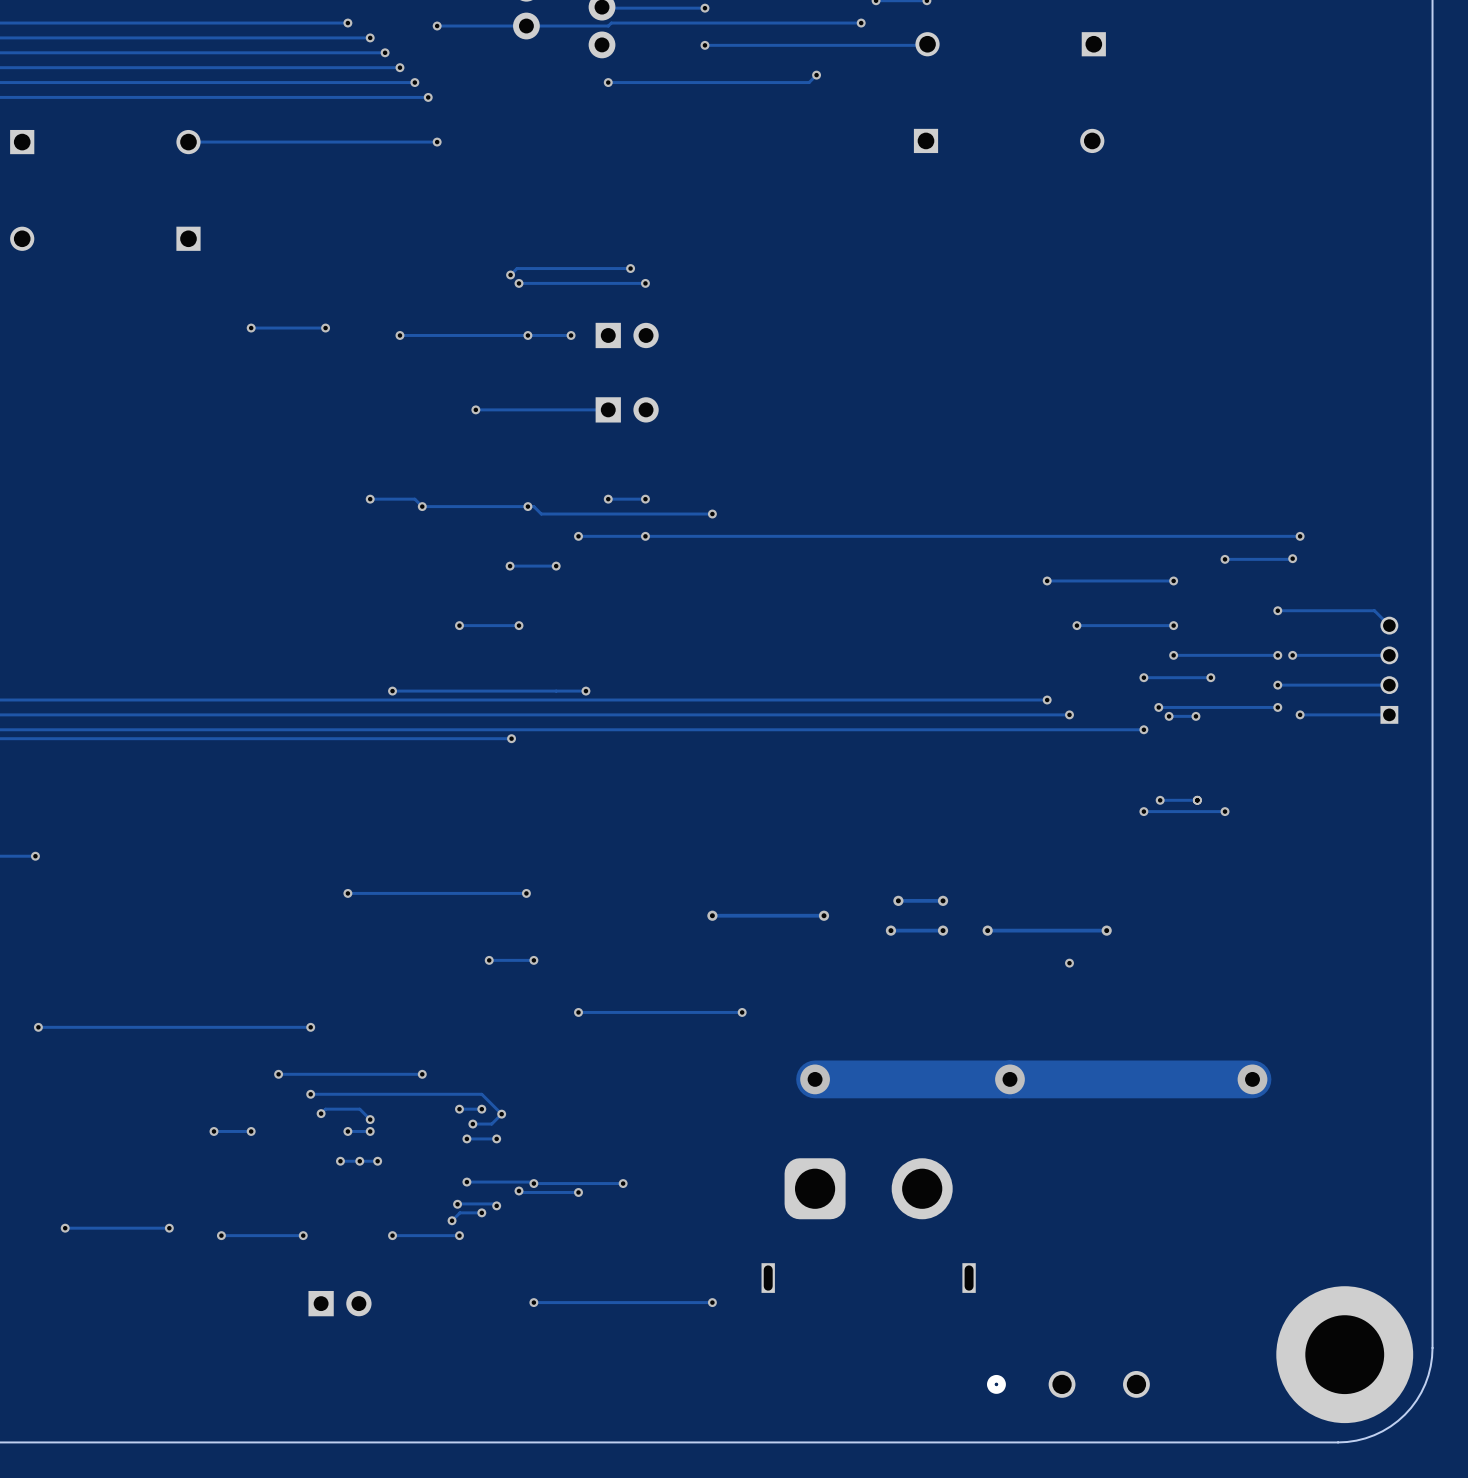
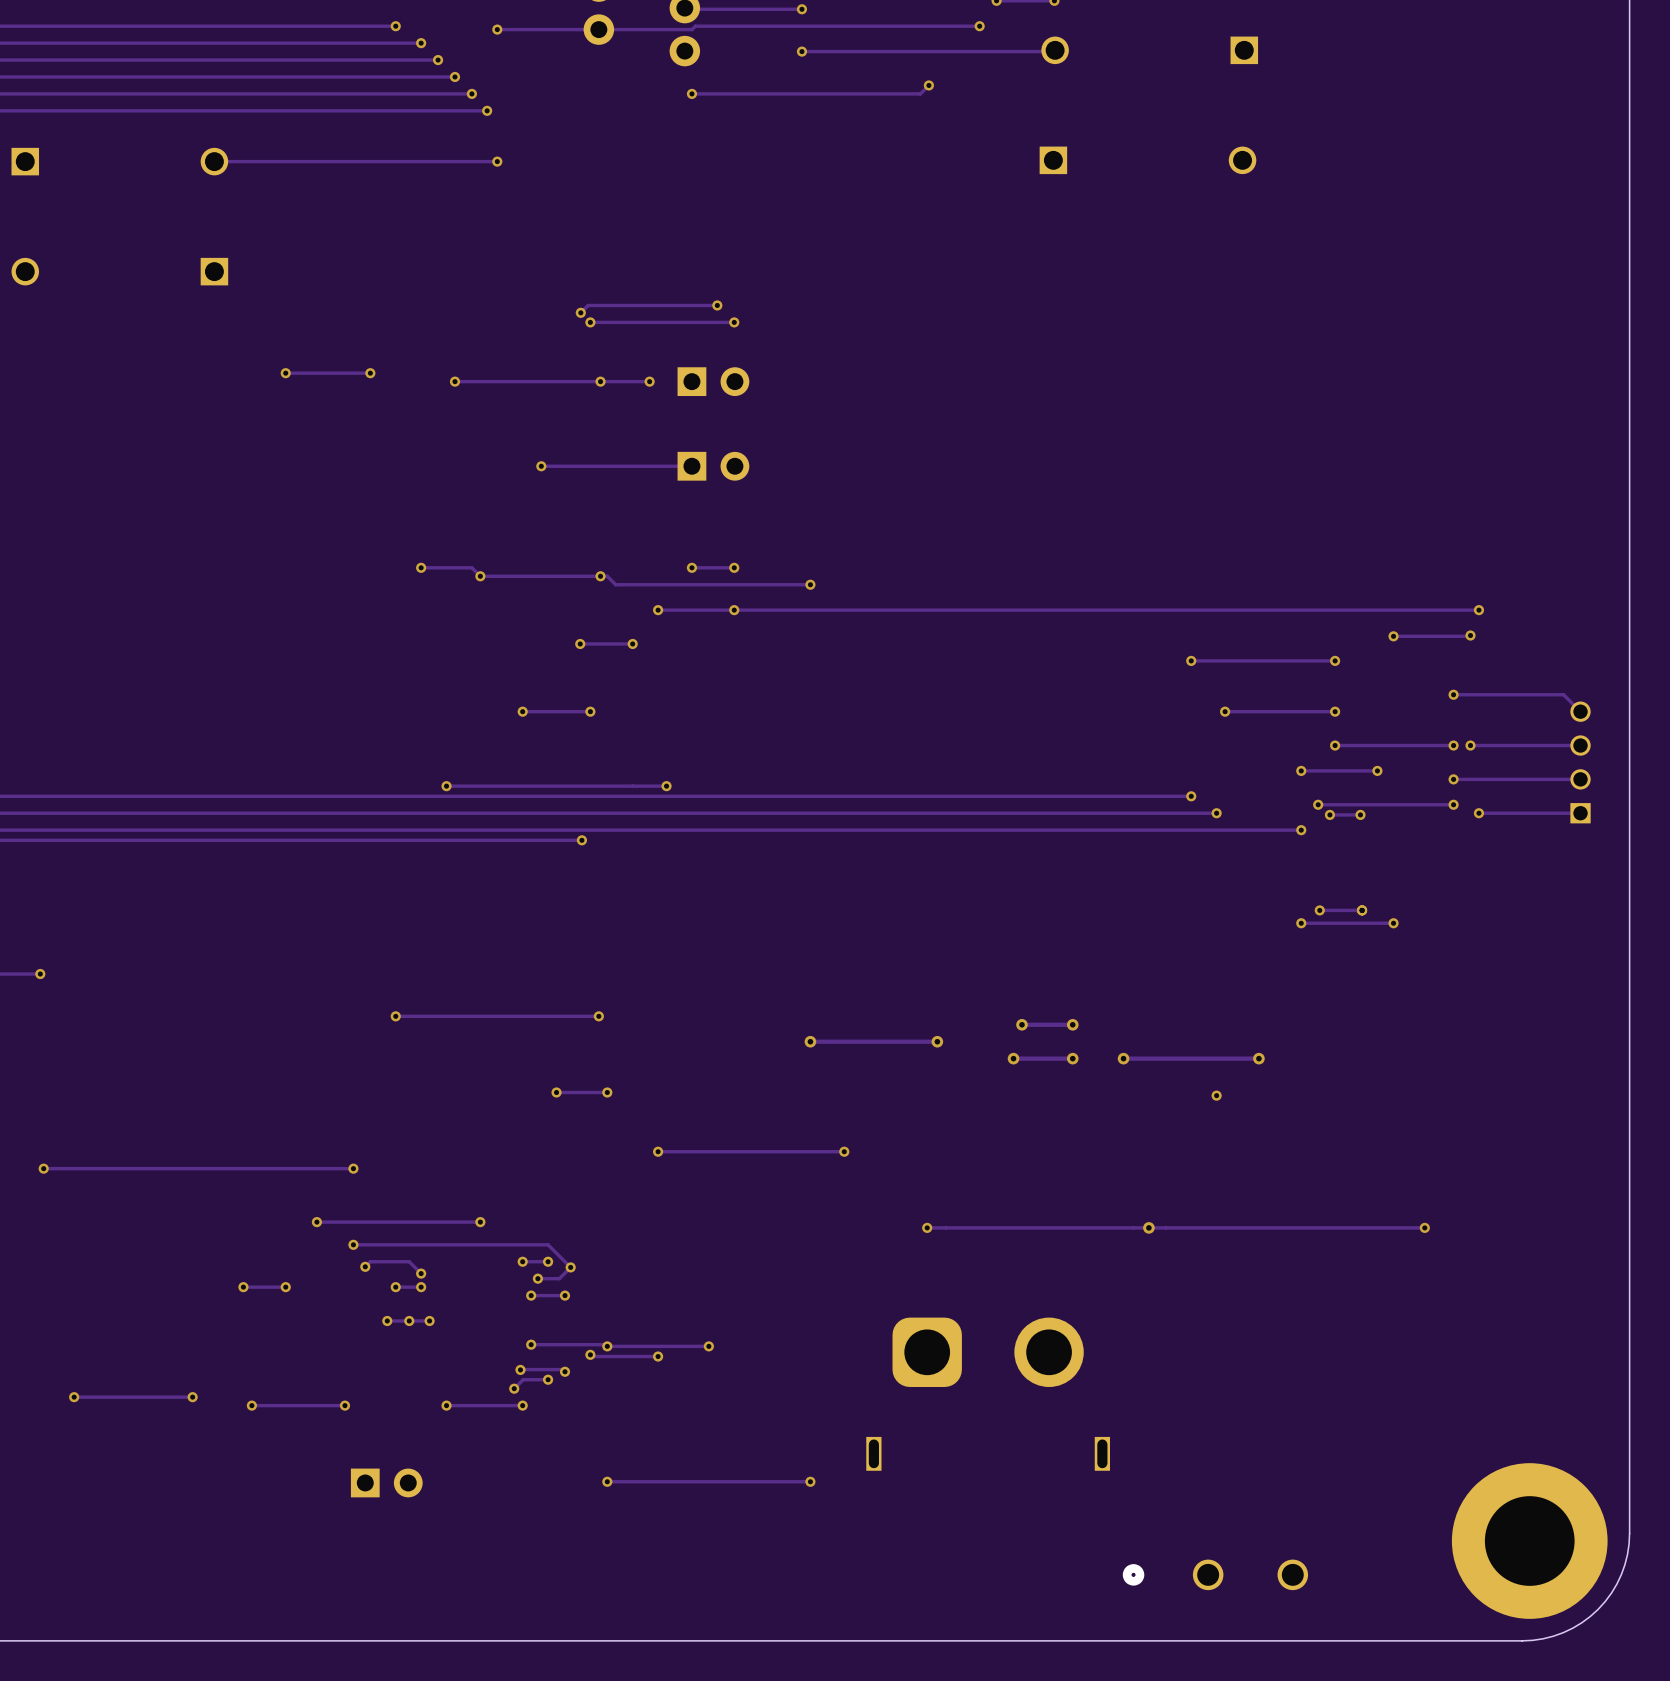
via size: [800, 1064, 830, 1095] -> [922, 1222, 933, 1233]
via size: [995, 1064, 1025, 1095] -> [1143, 1222, 1155, 1234]
via size: [1237, 1064, 1268, 1095] -> [1419, 1222, 1430, 1233]
track width: thick (1252, 1079) (815, 1079) -> thin (1424, 1227) (927, 1227)

